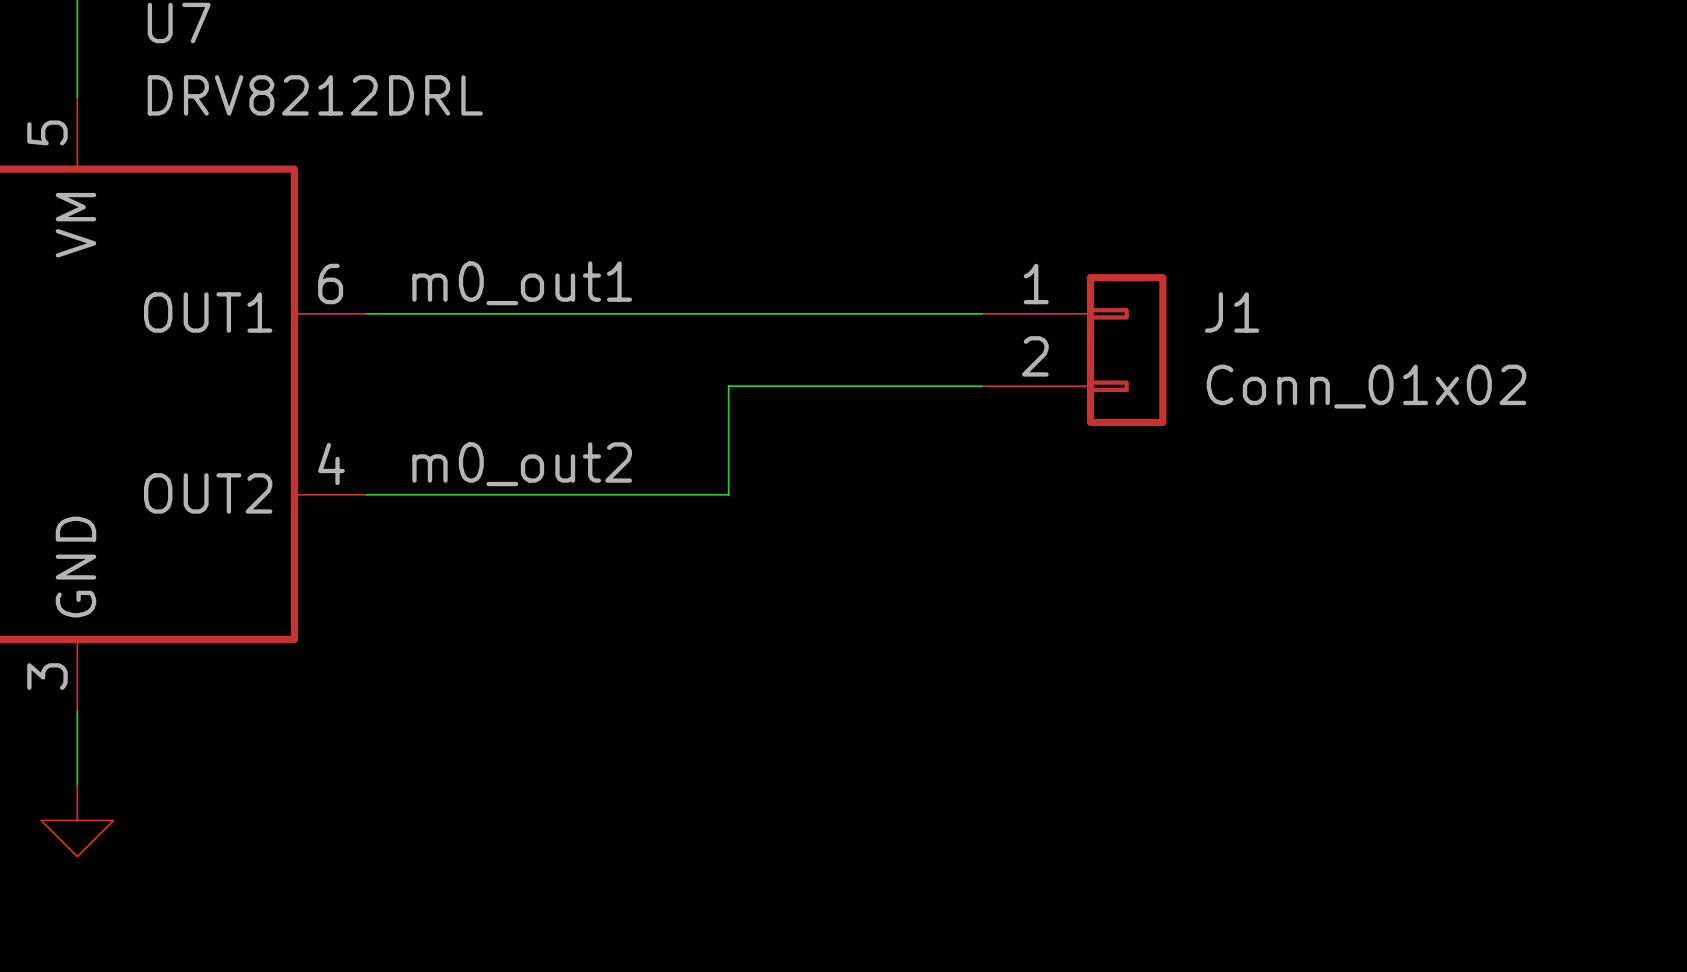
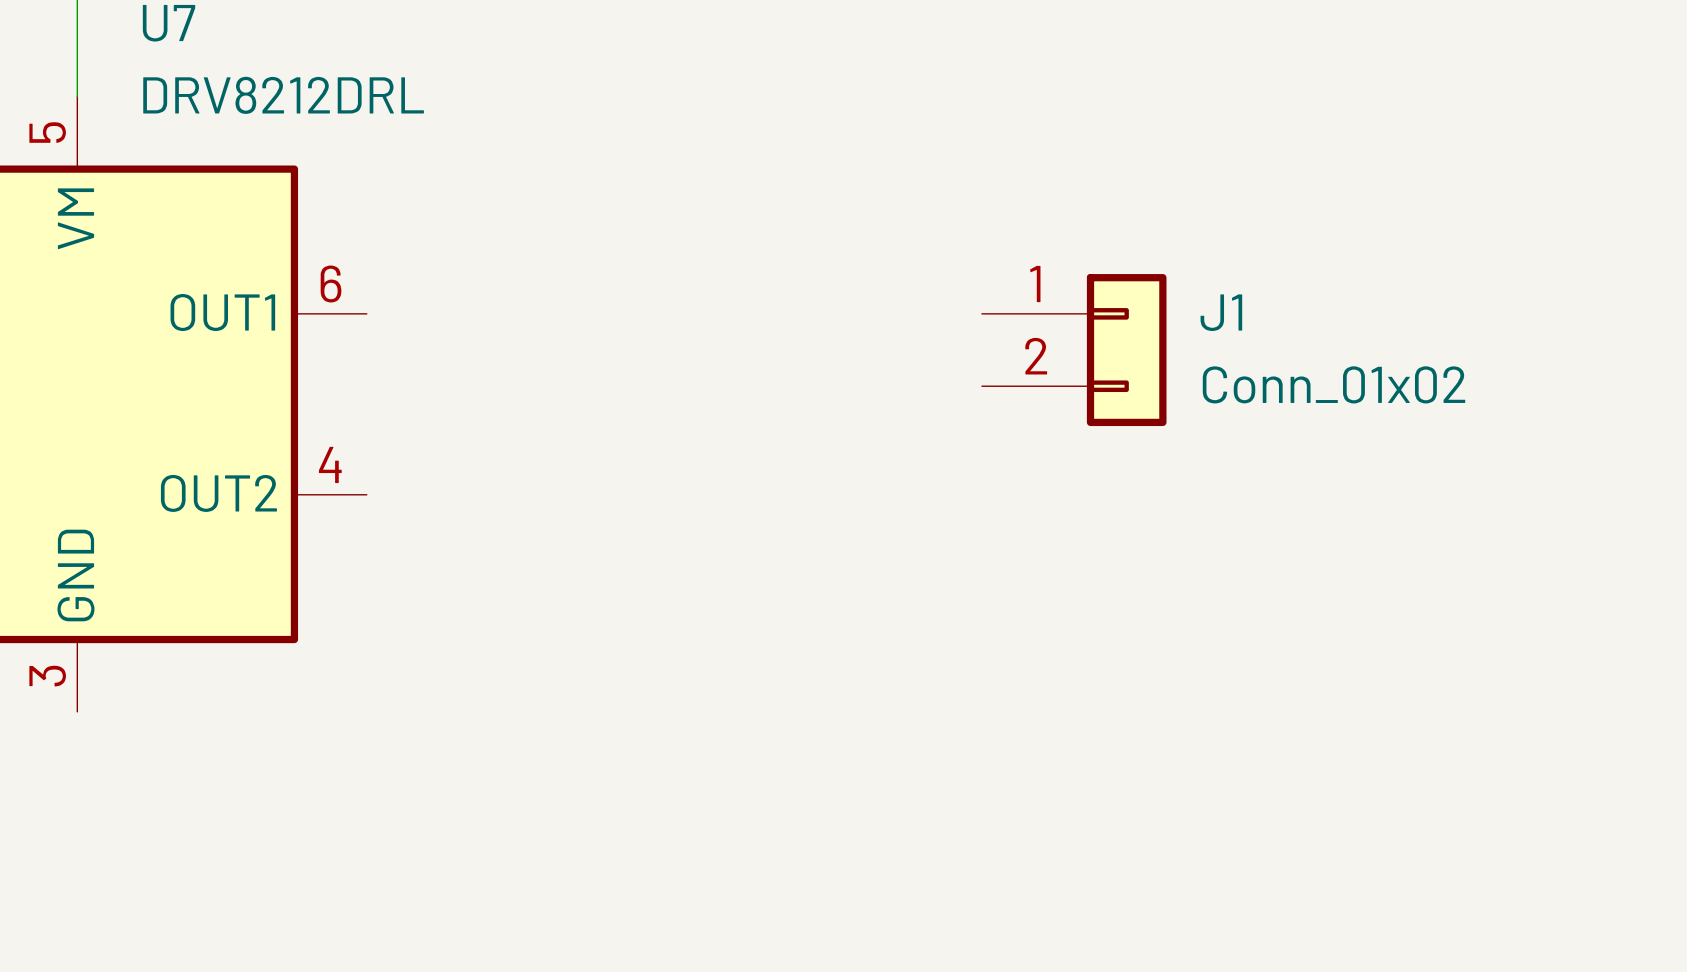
label: m0_out1 (522, 283) -> none
wire: (366, 313) (981, 313) -> none
wire: (981, 386) (728, 386) (728, 494) (366, 494) -> none
label: m0_out2 (522, 464) -> none
wire: (77, 711) (77, 784) -> none
power symbol: (77, 820) -> none

